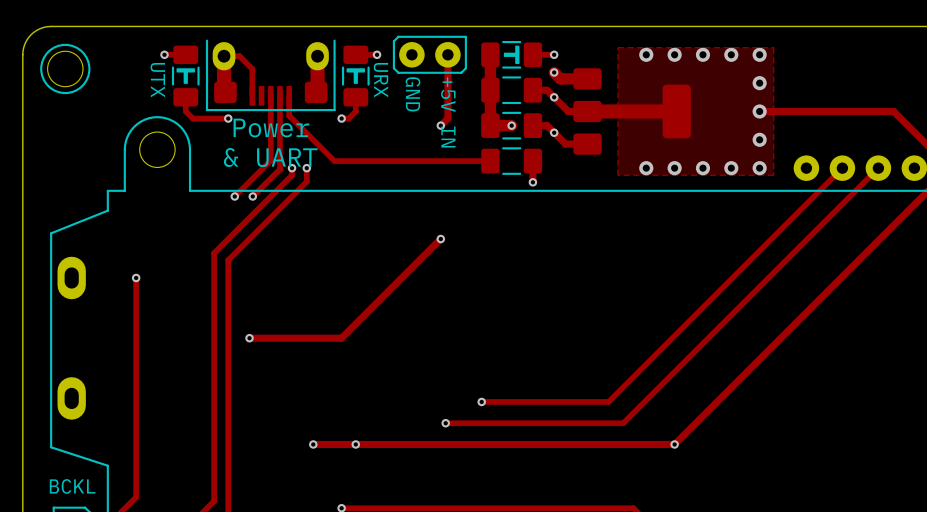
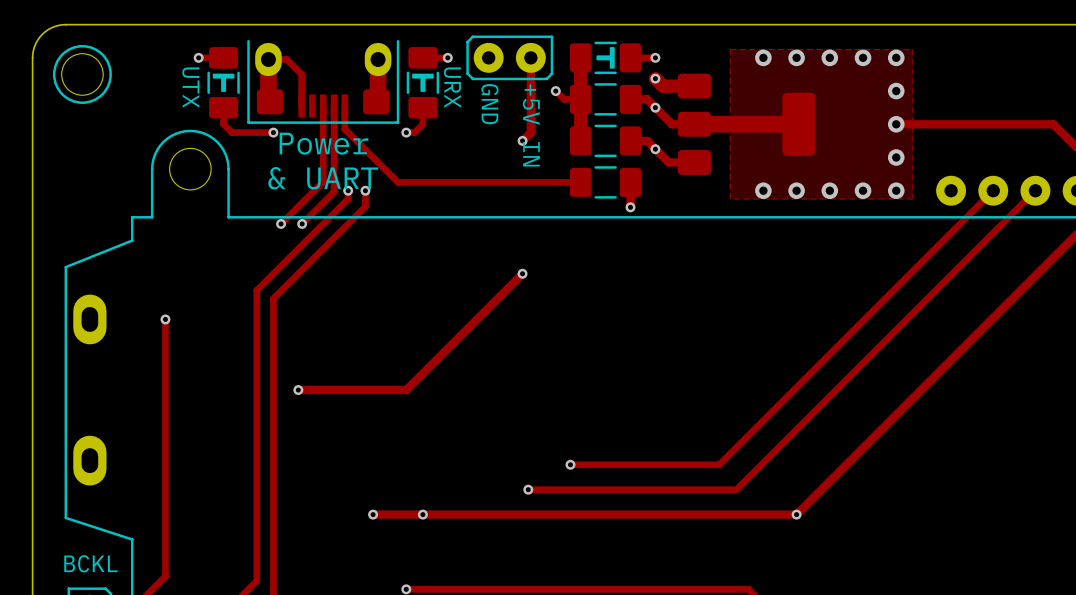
track: none -> (555, 91) (564, 99) (580, 99)
track: (490, 125) (511, 125) -> none
via position: (511, 125) -> (555, 91)

